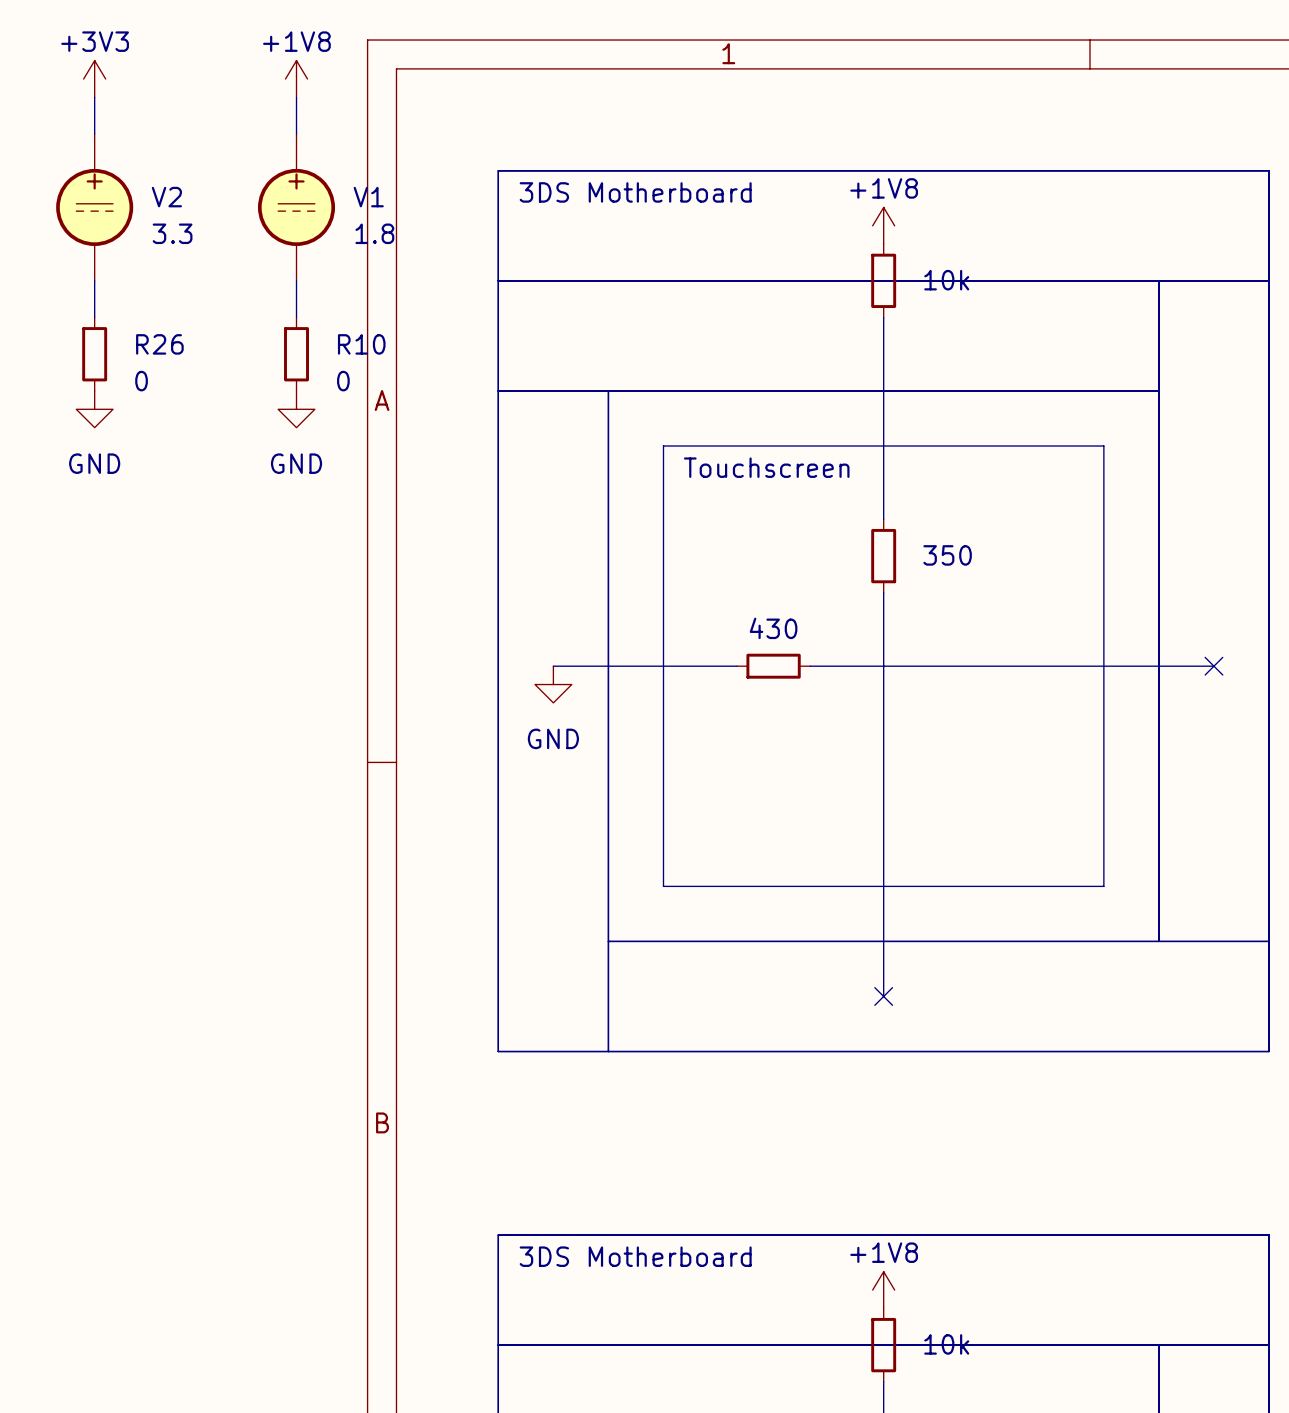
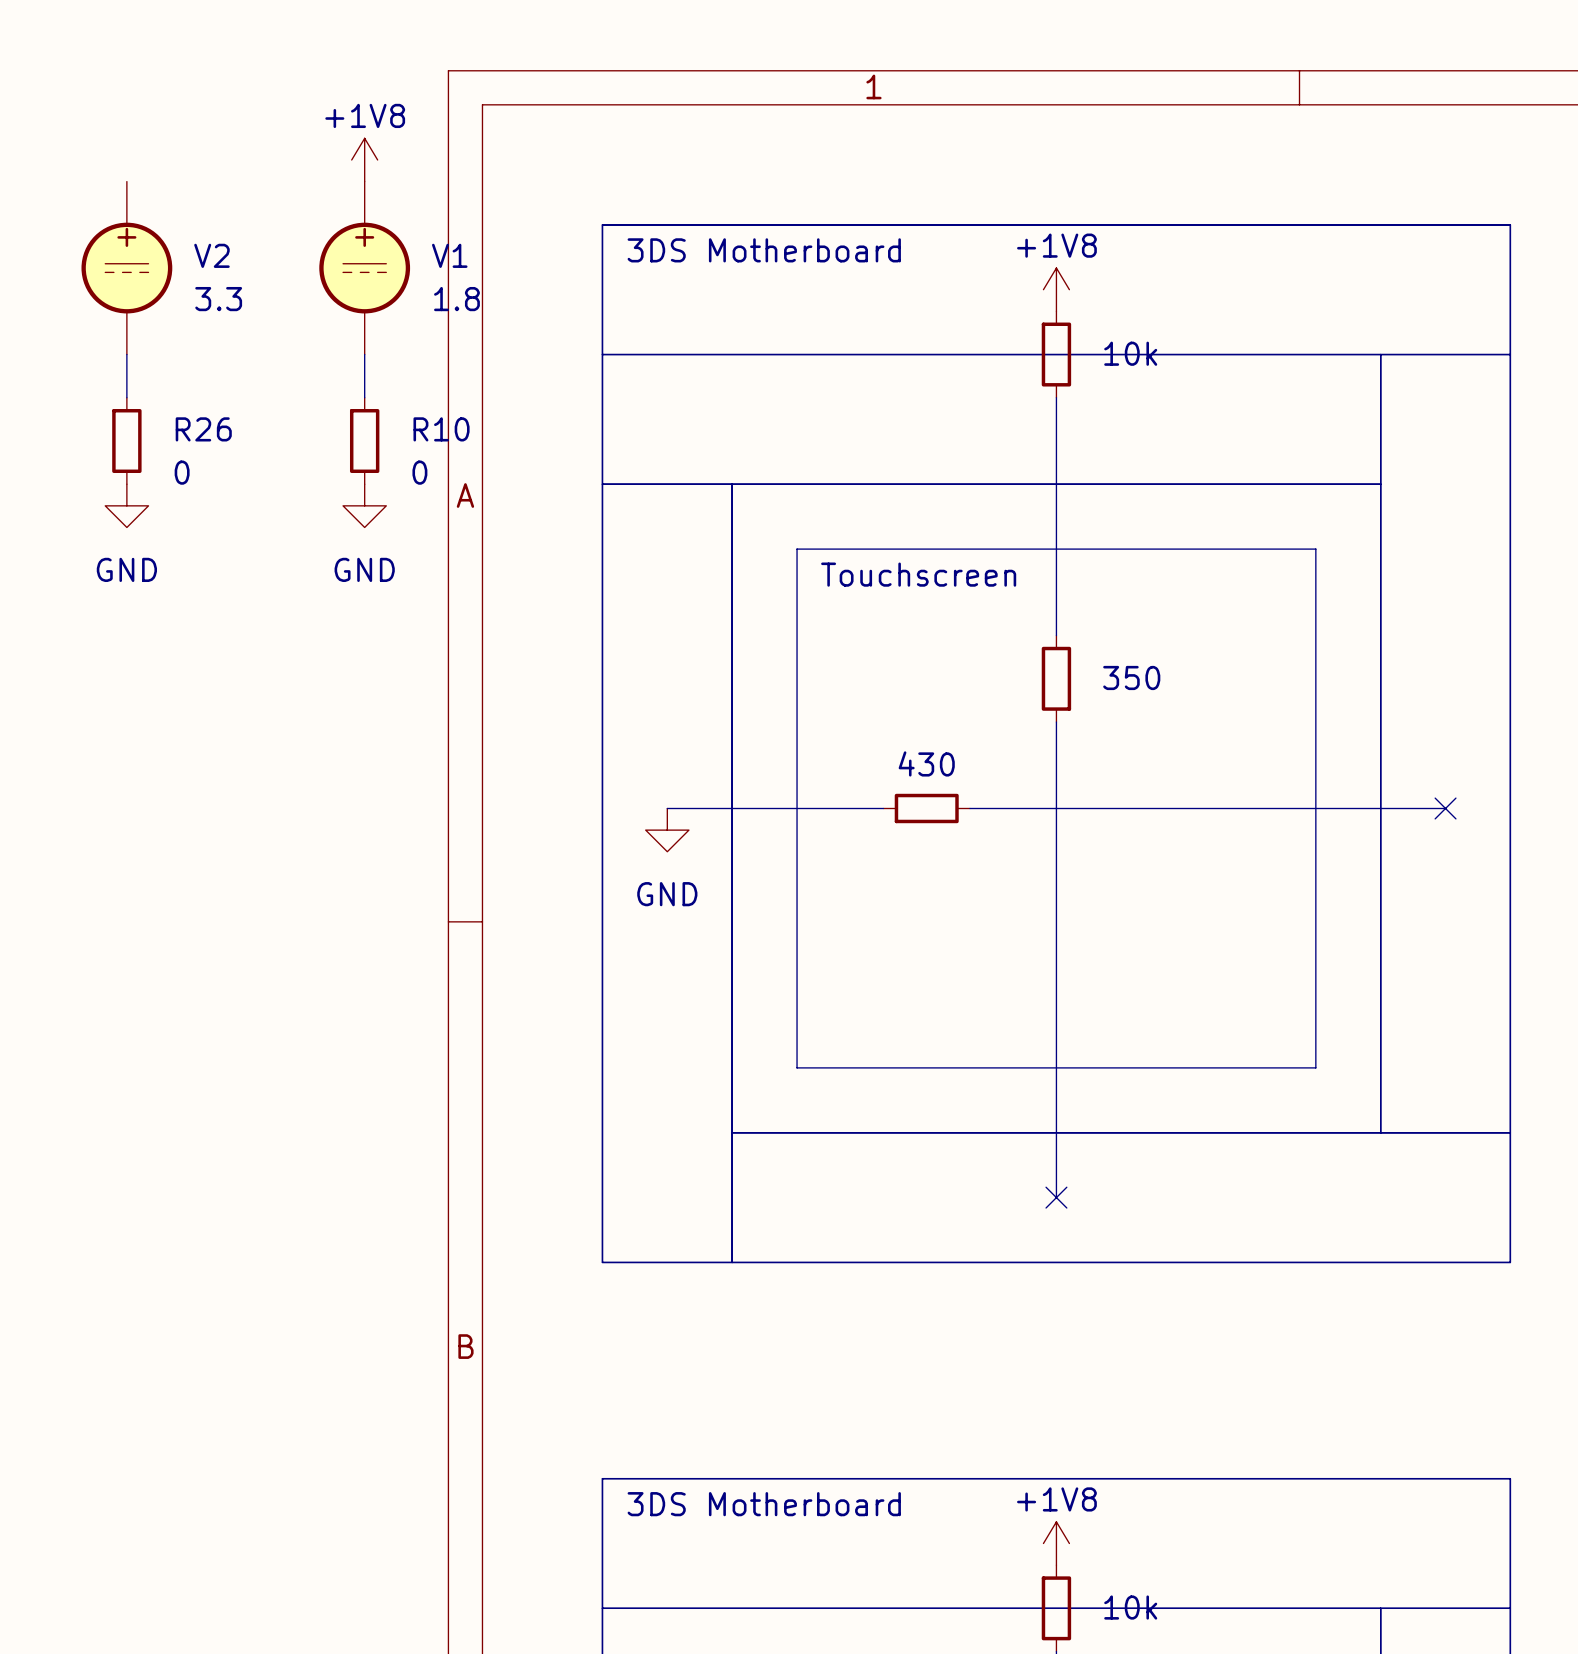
power symbol: +3V3 (94, 79) -> none
power symbol position: +1V8 (296, 79) -> +1V8 (364, 159)
wire: (94, 97) (94, 134) -> none

